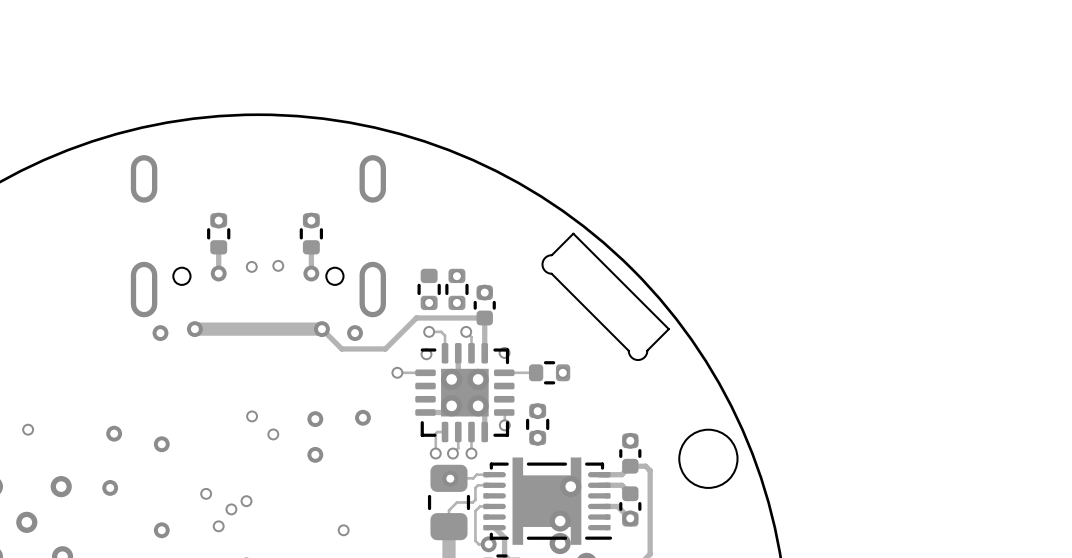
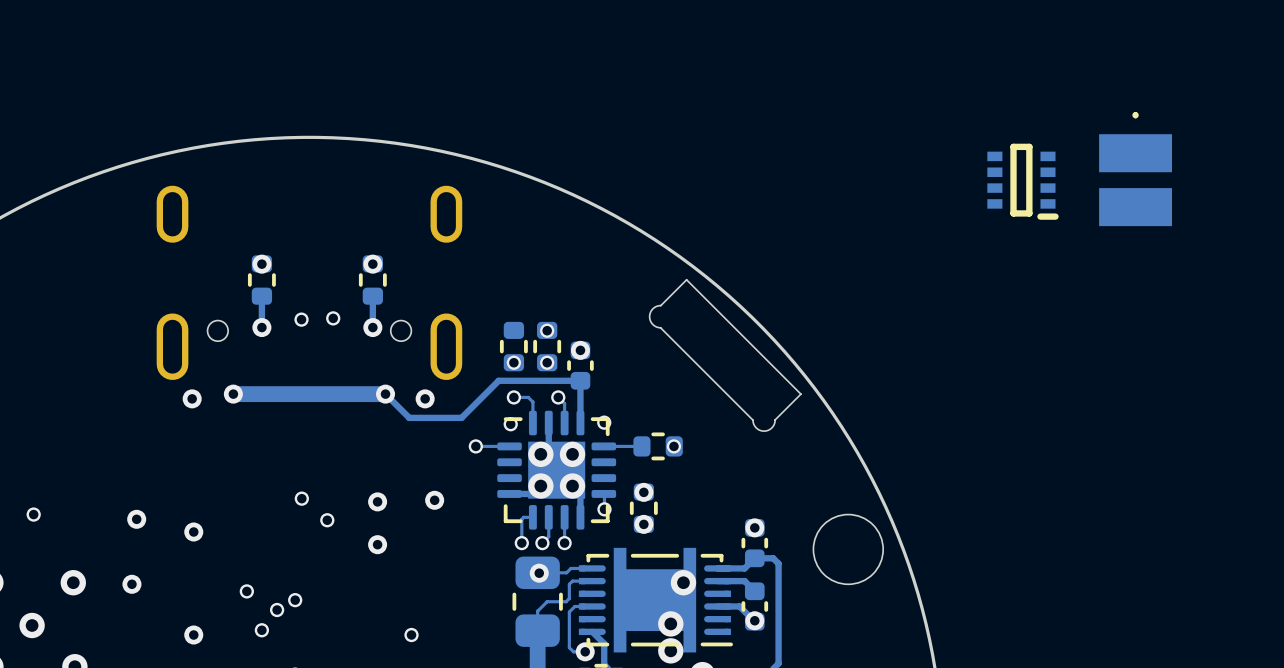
part: none -> (1135, 169)
part: none -> (1023, 181)

